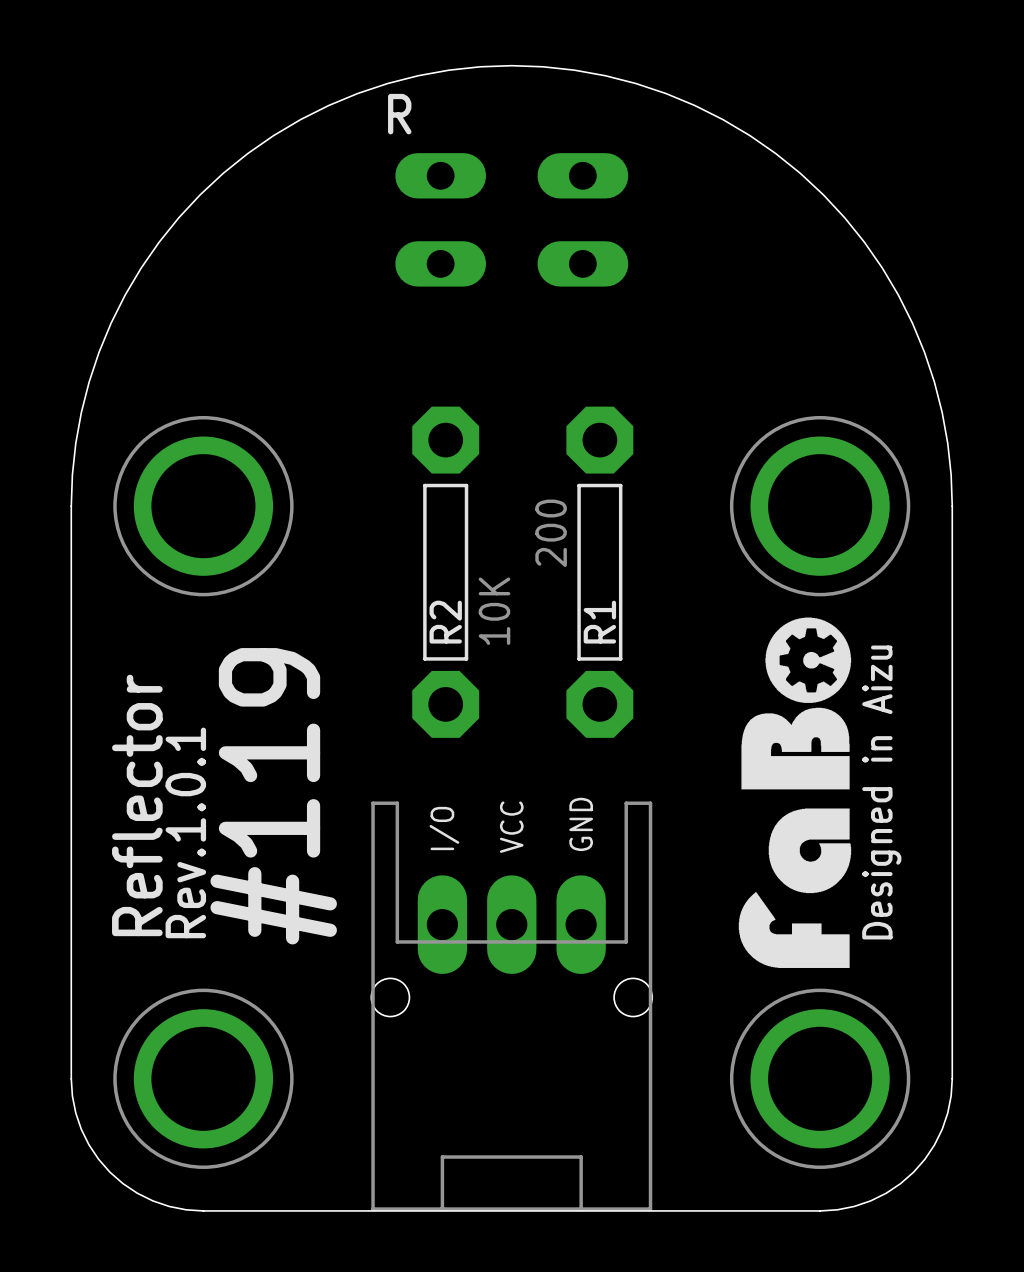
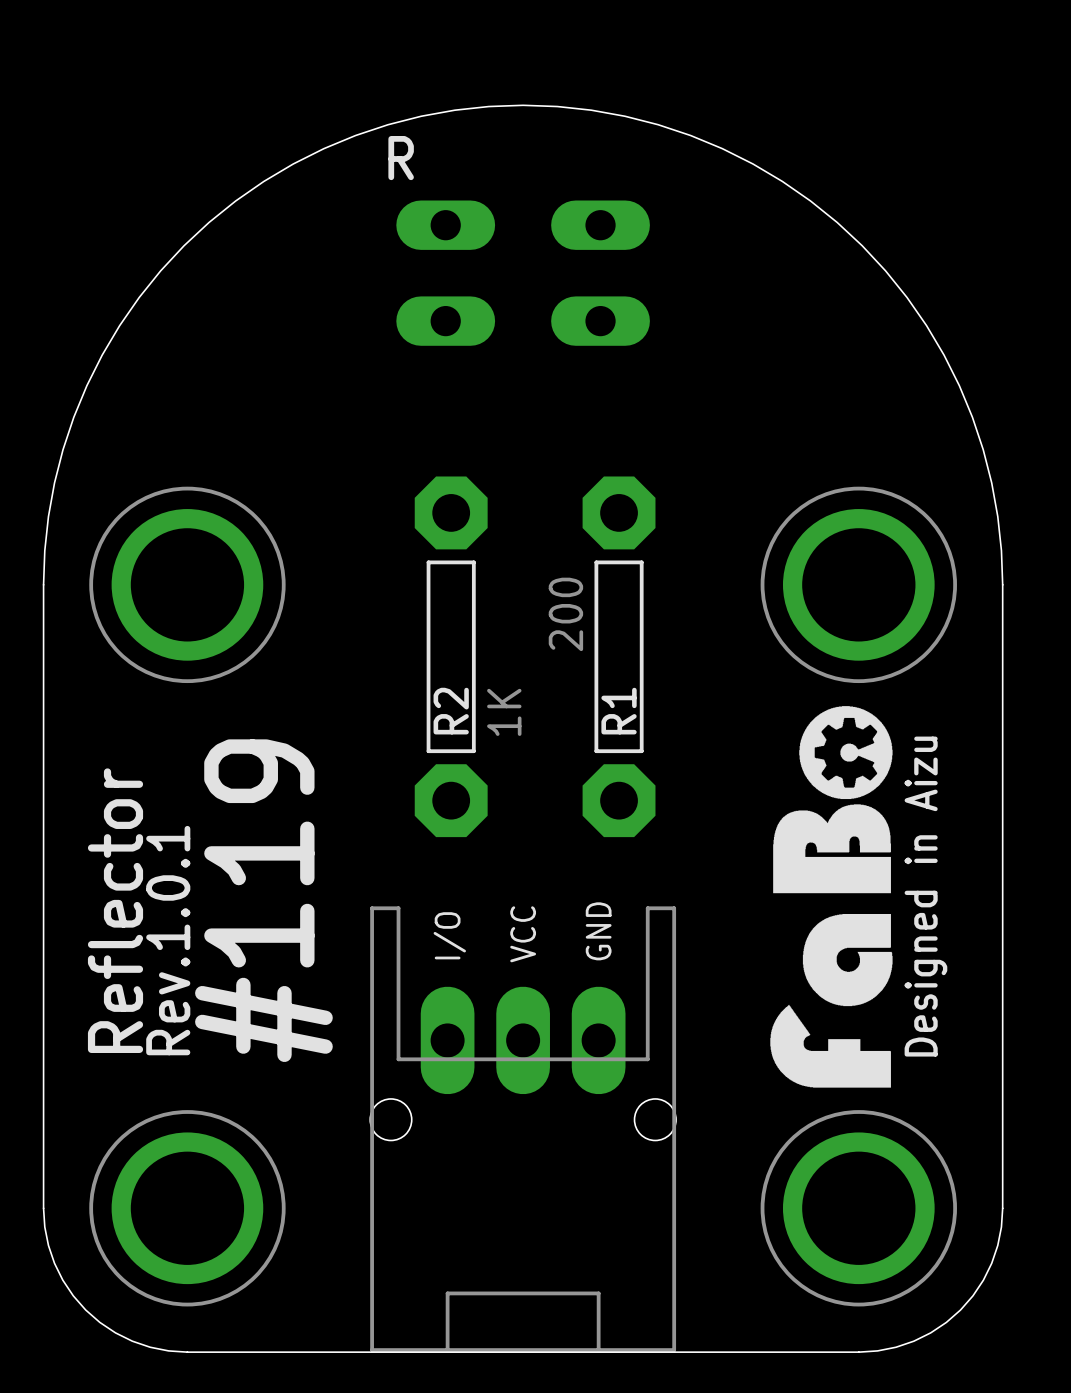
R2 value: 10K (494, 611) -> 1K (504, 712)

